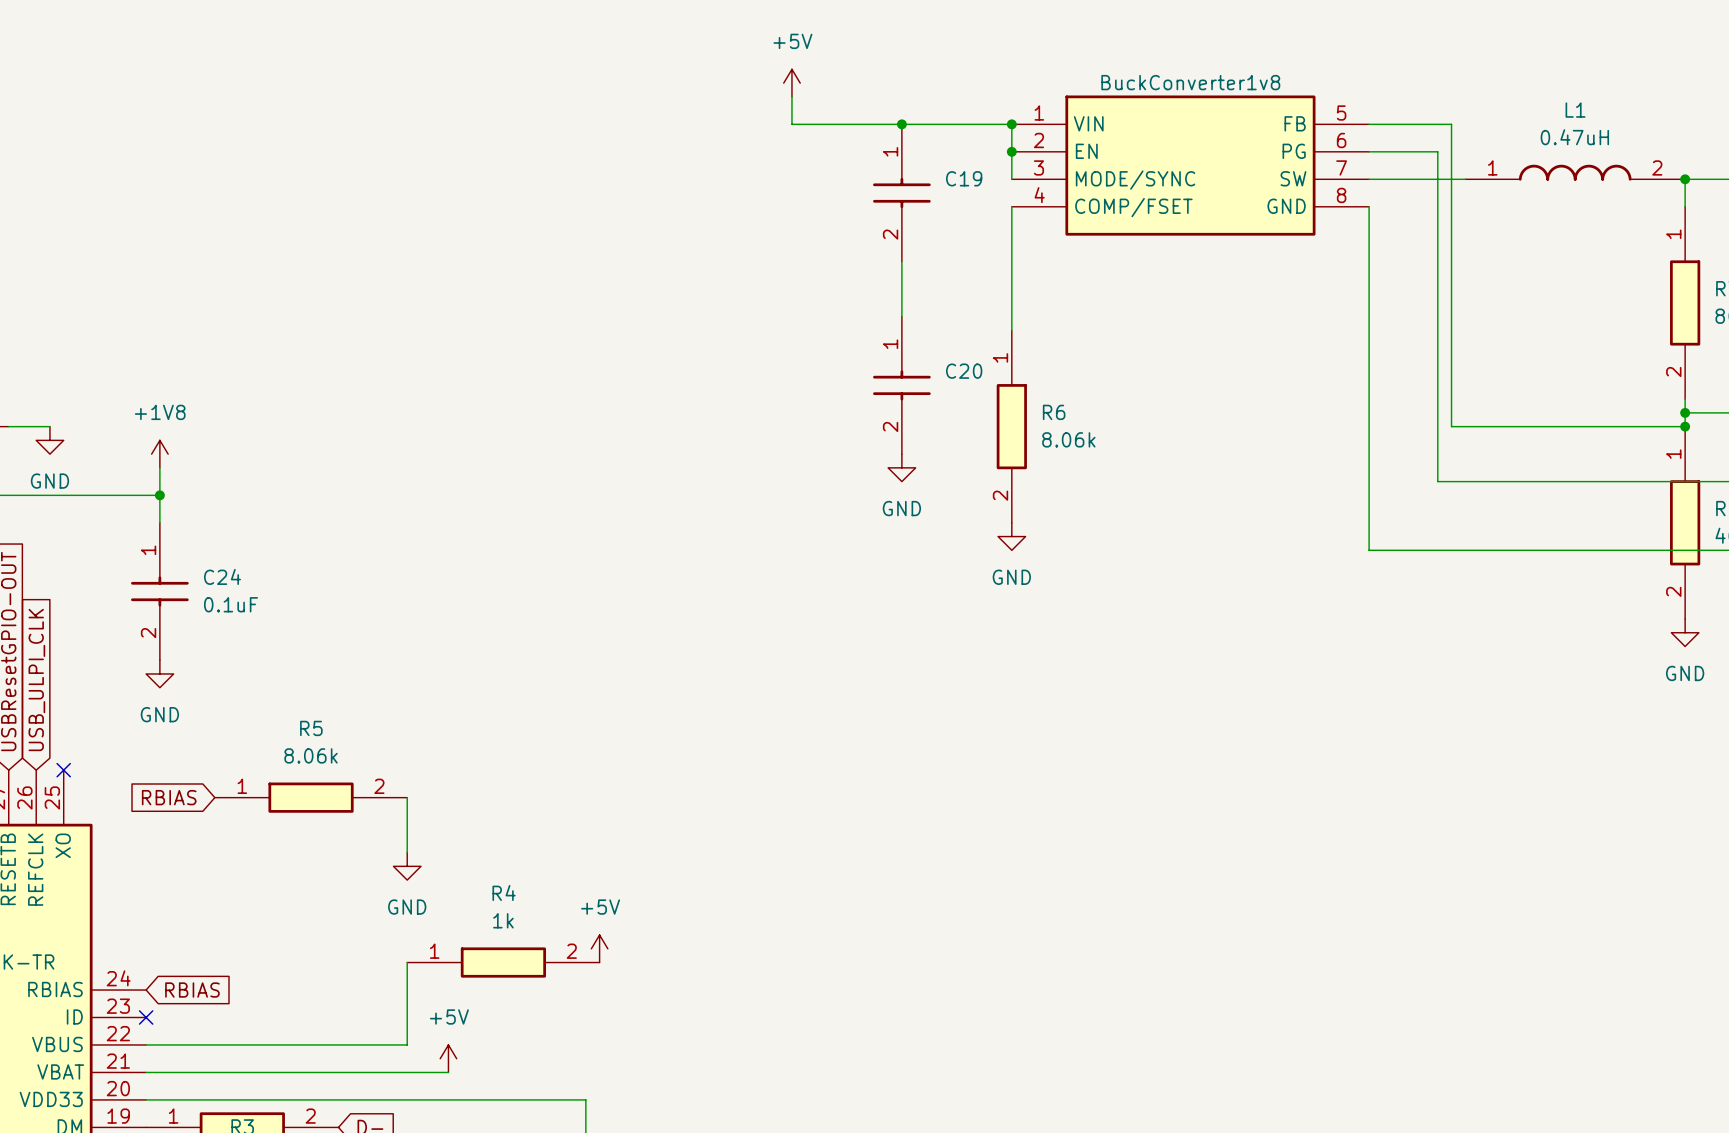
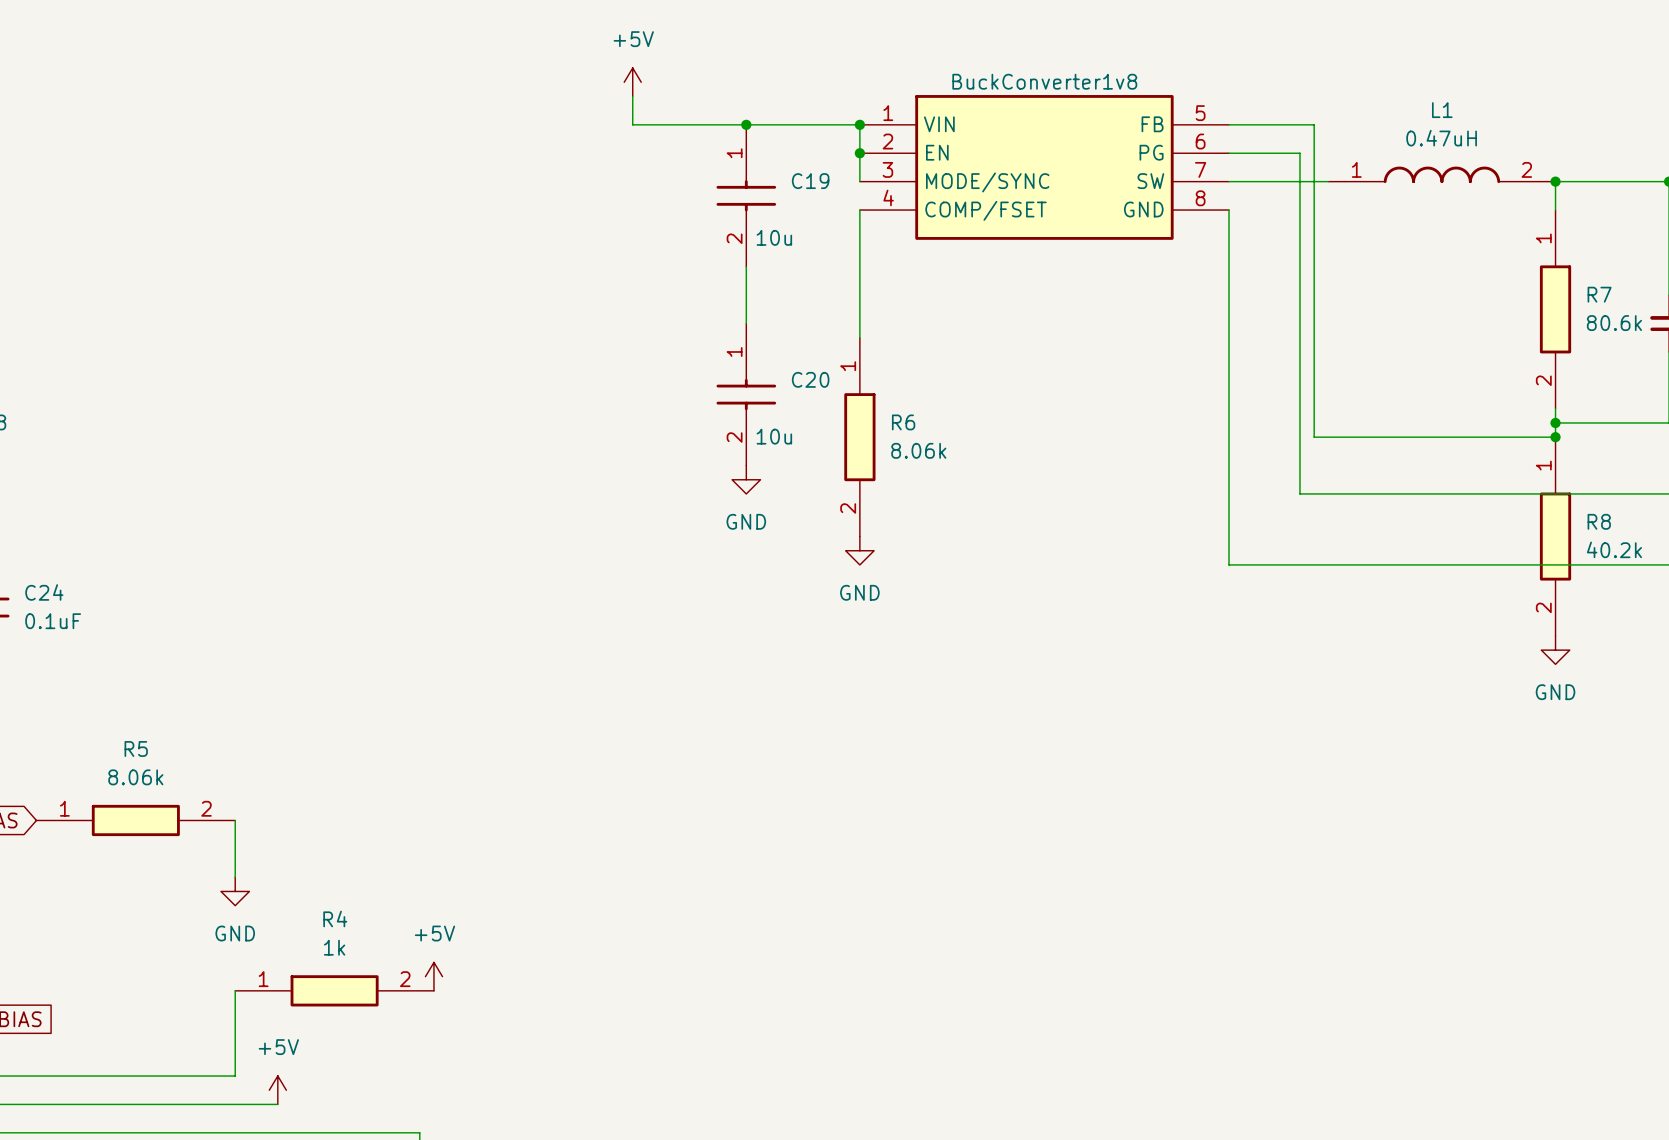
C19 text: none -> 10u (774, 237)
C20 text: none -> 10u (774, 436)

